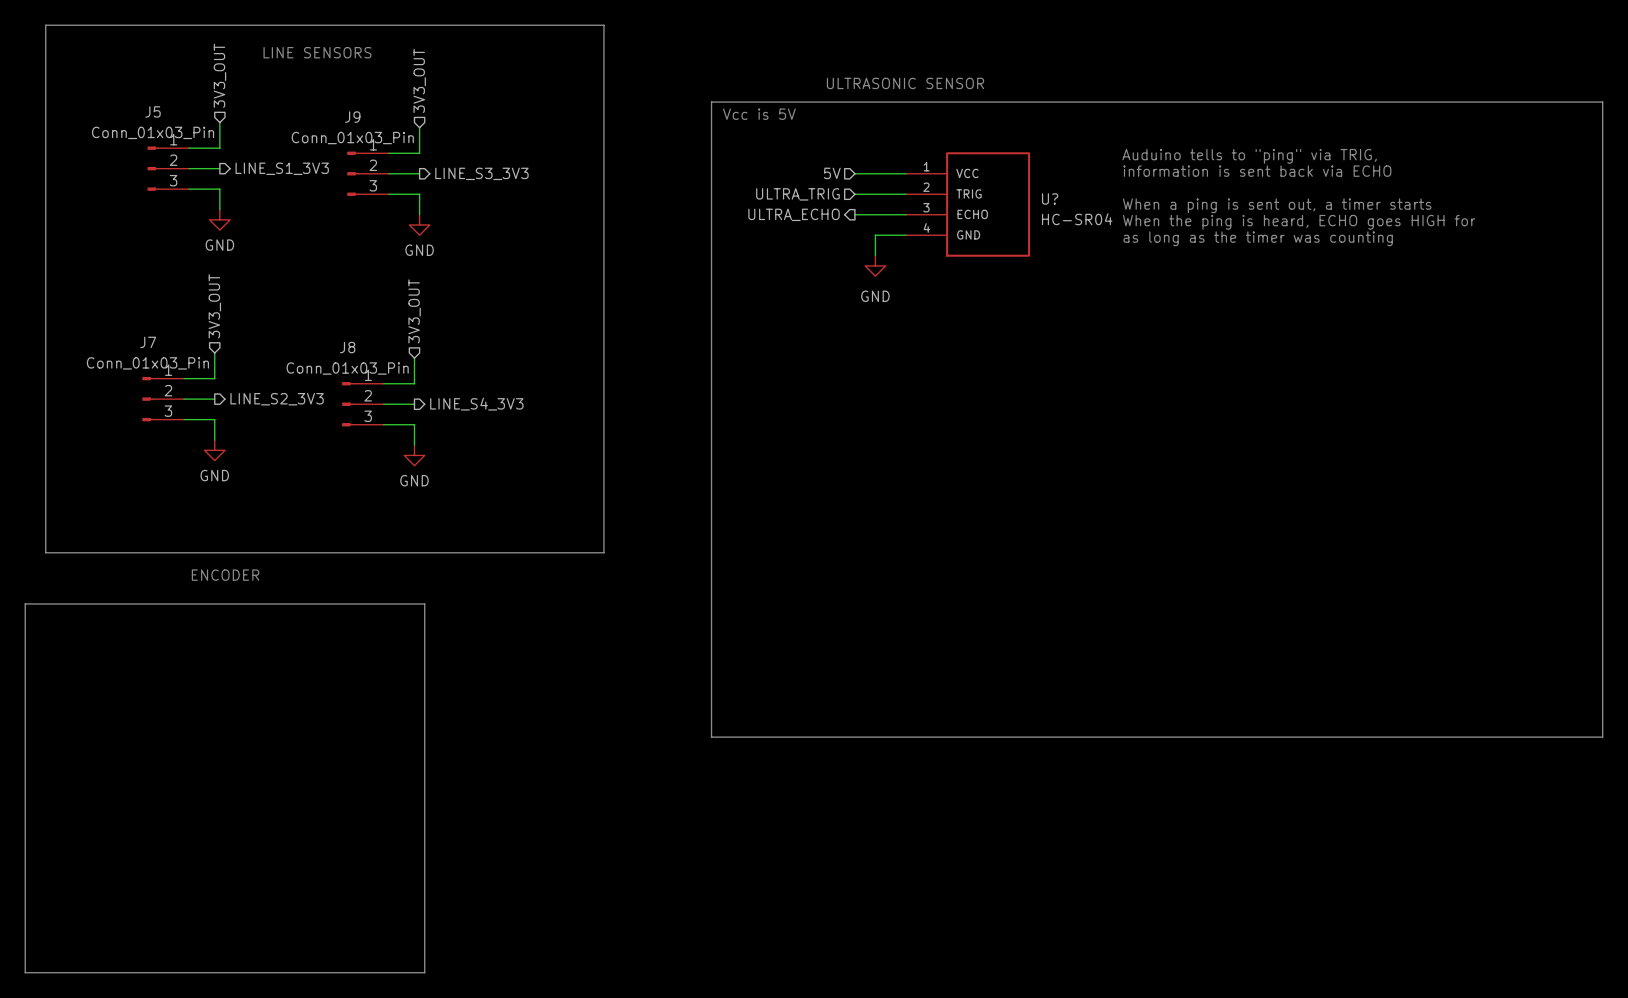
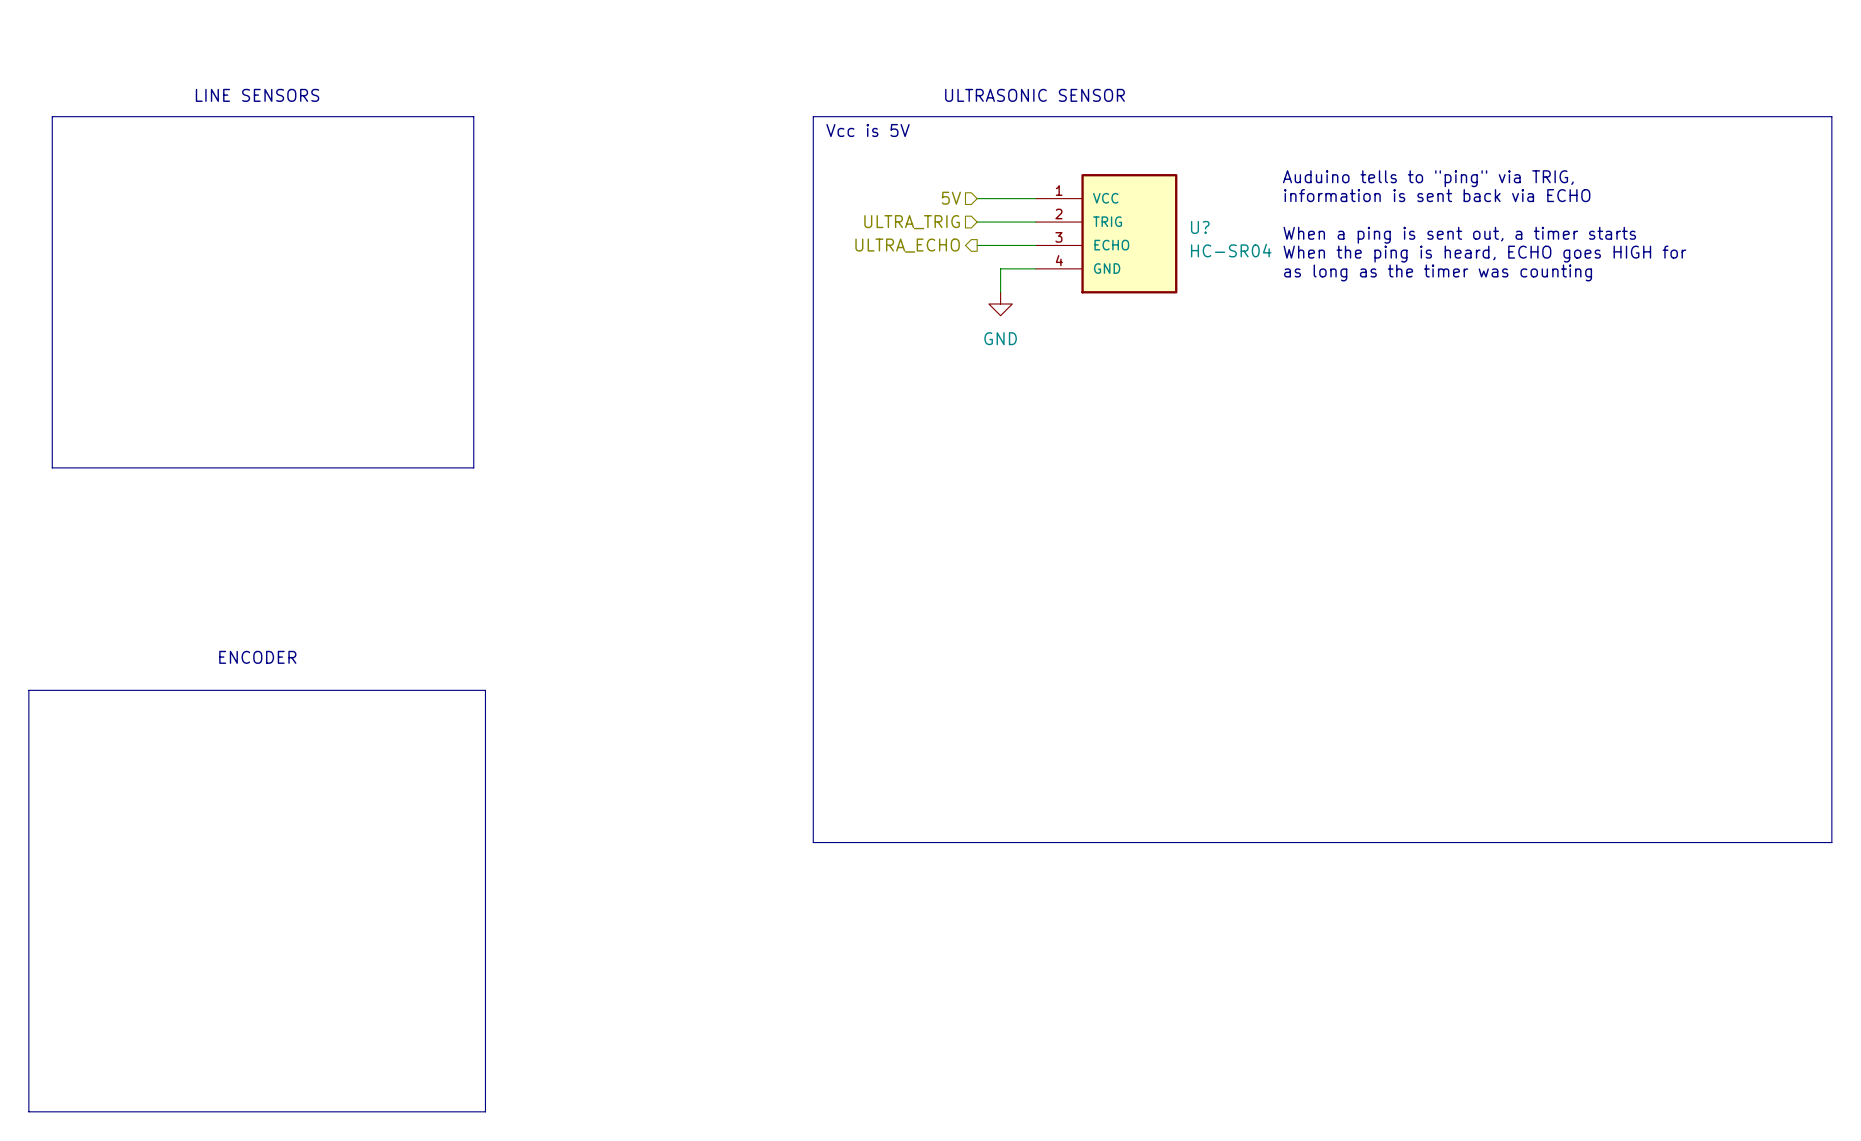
text position: LINE SENSORS (317, 52) -> LINE SENSORS (257, 95)
hierarchical label: 3V3_OUT (219, 75) -> none
hierarchical label: 3V3_OUT (419, 80) -> none
line: (45, 102) (45, 25) (603, 25) (603, 552) (45, 552) (45, 409) -> (52, 116) (473, 116) (473, 467) (52, 467)
wire: (219, 122) (219, 148) (189, 148) -> none
wire: (419, 127) (419, 153) (388, 153) -> none
J5: Conn_01x03_Pin (168, 168) -> none
wire: (189, 168) (219, 168) -> none
hierarchical label: LINE_S1_3V3 (282, 168) -> none
J9: Conn_01x03_Pin (368, 173) -> none
wire: (388, 173) (419, 173) -> none
hierarchical label: LINE_S3_3V3 (481, 173) -> none
wire: (189, 189) (219, 189) (219, 209) -> none
wire: (388, 194) (419, 194) (419, 214) -> none
power symbol: GND (219, 219) -> none
power symbol: GND (419, 224) -> none
hierarchical label: 3V3_OUT (214, 306) -> none
hierarchical label: 3V3_OUT (414, 311) -> none
wire: (214, 353) (214, 378) (184, 378) -> none
wire: (414, 358) (414, 383) (383, 383) -> none
J7: Conn_01x03_Pin (163, 399) -> none
wire: (184, 399) (214, 399) -> none
hierarchical label: LINE_S2_3V3 (277, 399) -> none
J8: Conn_01x03_Pin (362, 404) -> none
wire: (383, 404) (414, 404) -> none
hierarchical label: LINE_S4_3V3 (476, 404) -> none
wire: (184, 419) (214, 419) (214, 440) -> none
wire: (383, 424) (414, 424) (414, 445) -> none
power symbol: GND (214, 450) -> none
power symbol: GND (414, 455) -> none

